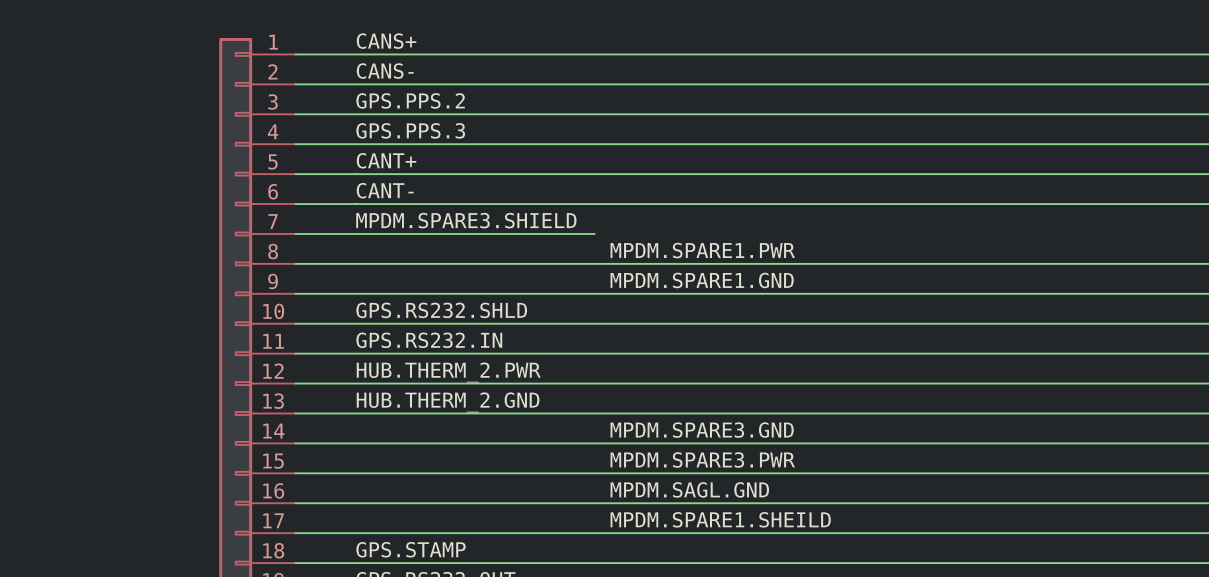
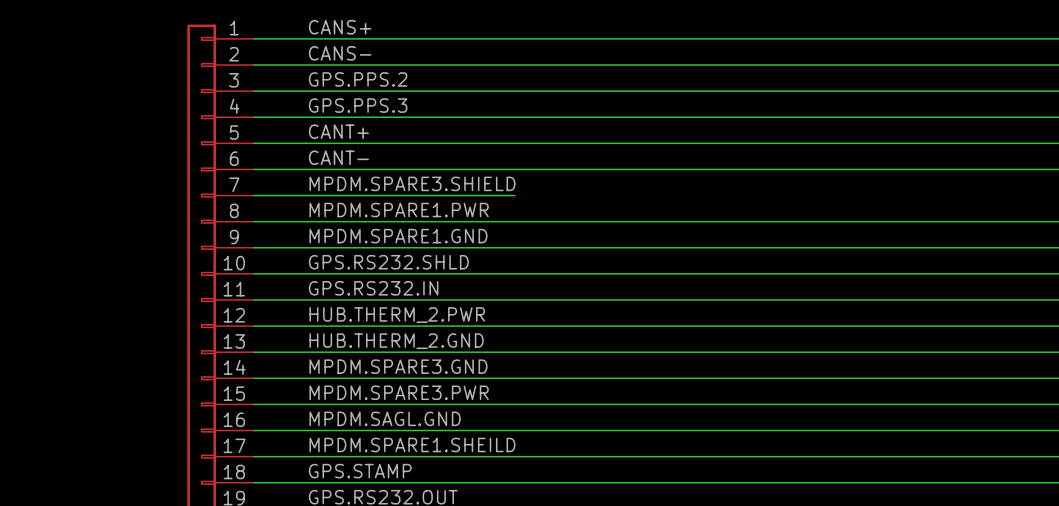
label position: MPDM.SPARE1.PWR (702, 250) -> MPDM.SPARE1.PWR (399, 210)
label position: MPDM.SPARE1.GND (702, 280) -> MPDM.SPARE1.GND (398, 236)
label position: MPDM.SPARE3.GND (702, 430) -> MPDM.SPARE3.GND (398, 366)
label position: MPDM.SPARE3.PWR (702, 459) -> MPDM.SPARE3.PWR (399, 392)
label position: MPDM.SAGL.GND (689, 489) -> MPDM.SAGL.GND (385, 418)
label position: MPDM.SPARE1.SHEILD (720, 519) -> MPDM.SPARE1.SHEILD (412, 444)

